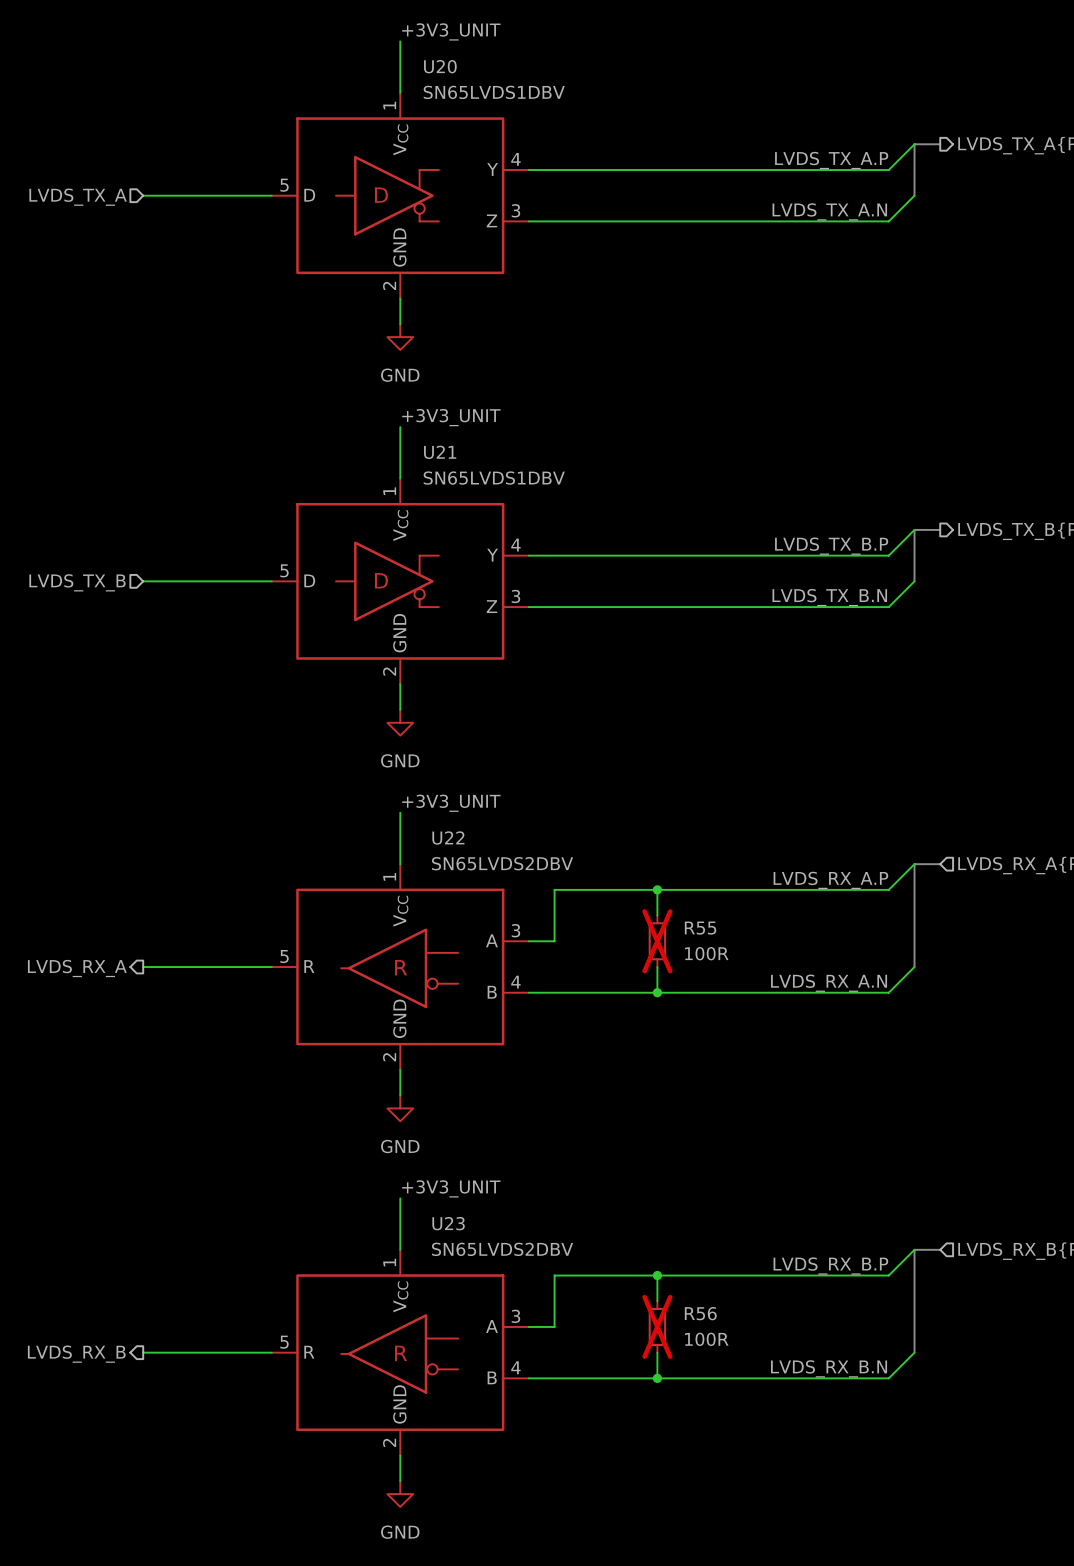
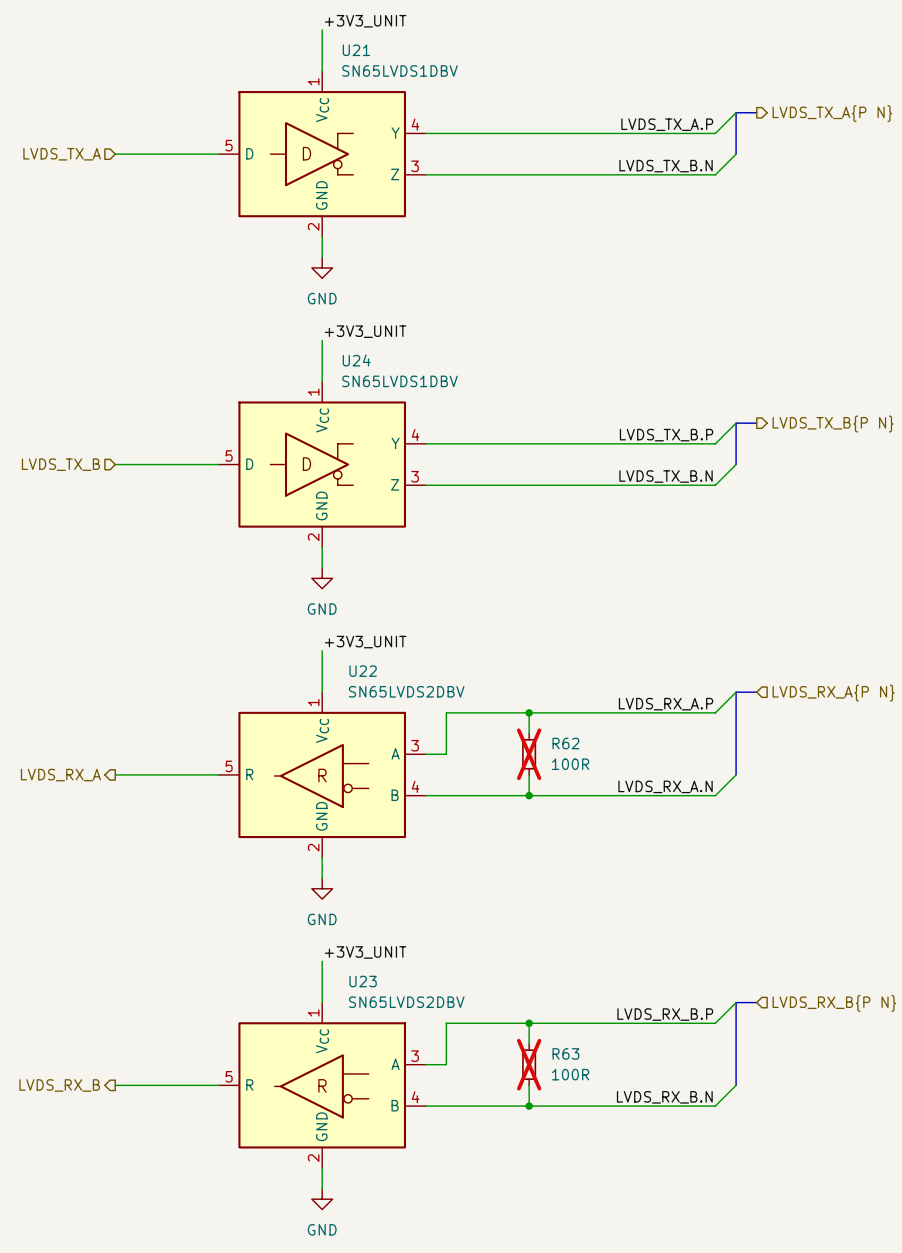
U20 name: U20 (440, 66) -> U21 (356, 50)
label: LVDS_TX_A.N (829, 211) -> LVDS_TX_B.N (666, 166)
U21 name: U21 (440, 452) -> U24 (356, 360)
R55 name: R55 (700, 928) -> R62 (565, 743)
R56 name: R56 (700, 1313) -> R63 (565, 1053)

